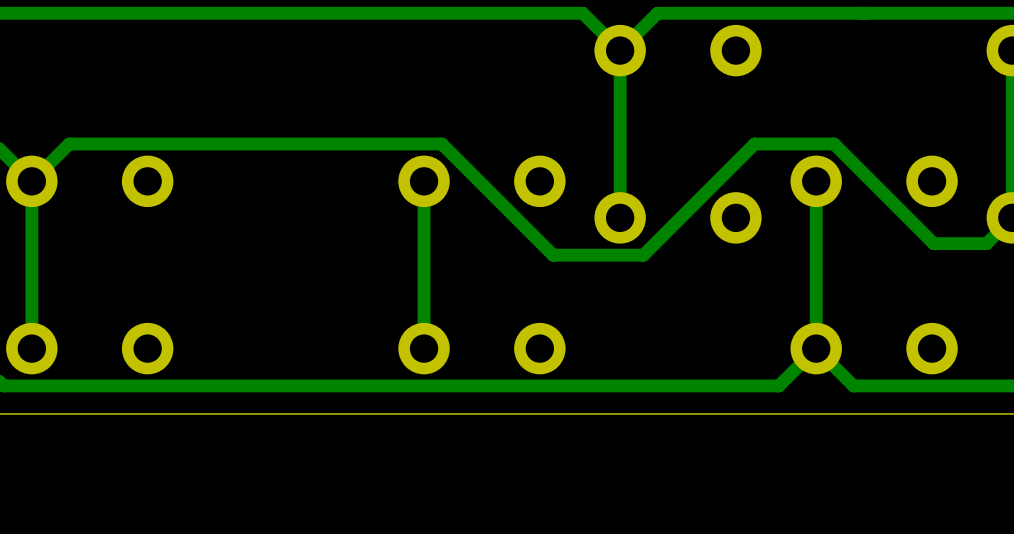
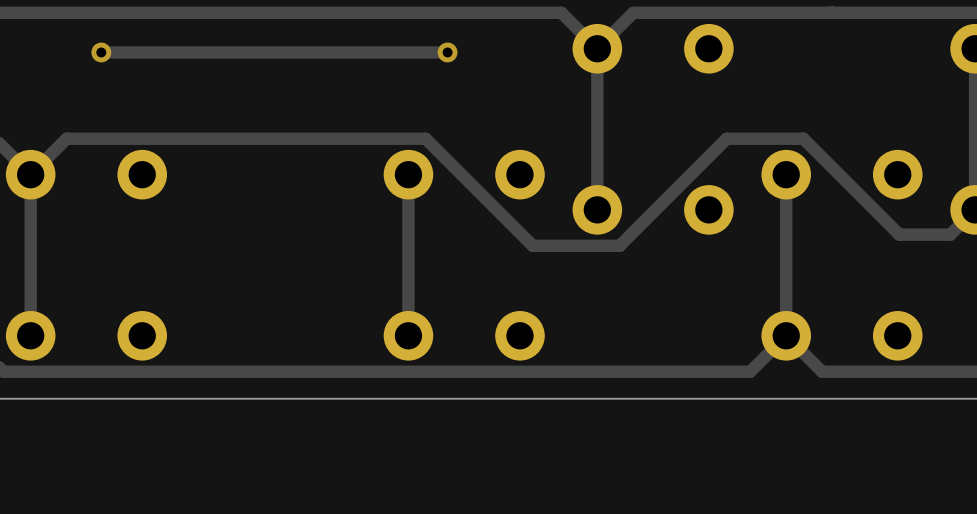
via: none -> (101, 52)
track: none -> (447, 52) (101, 52)
via: none -> (447, 52)

